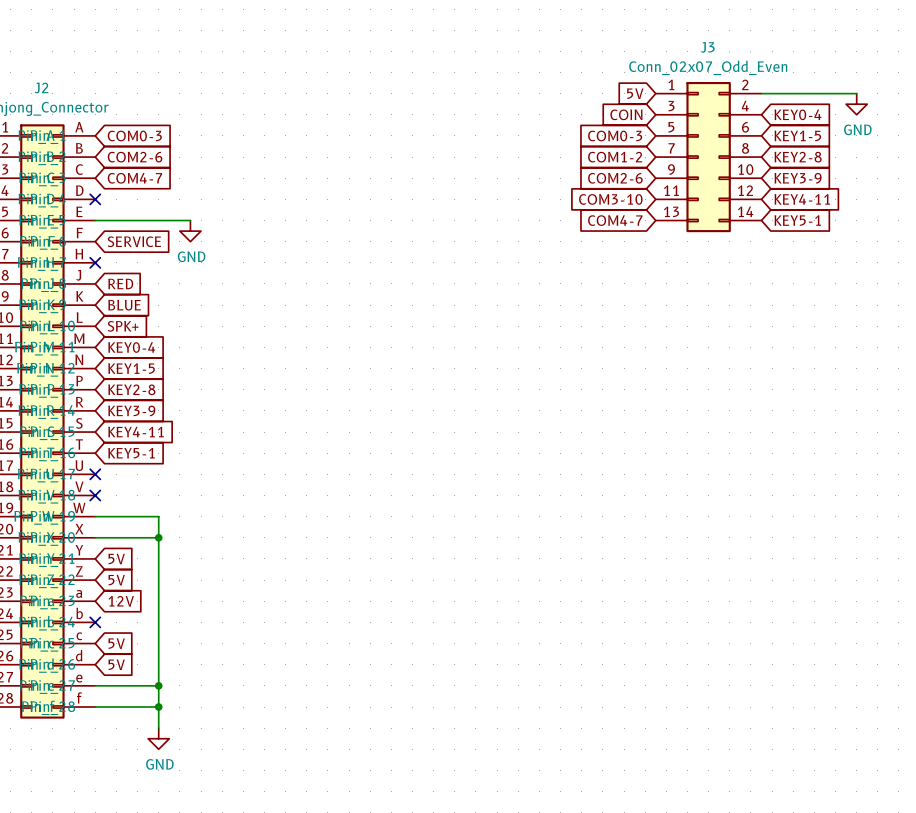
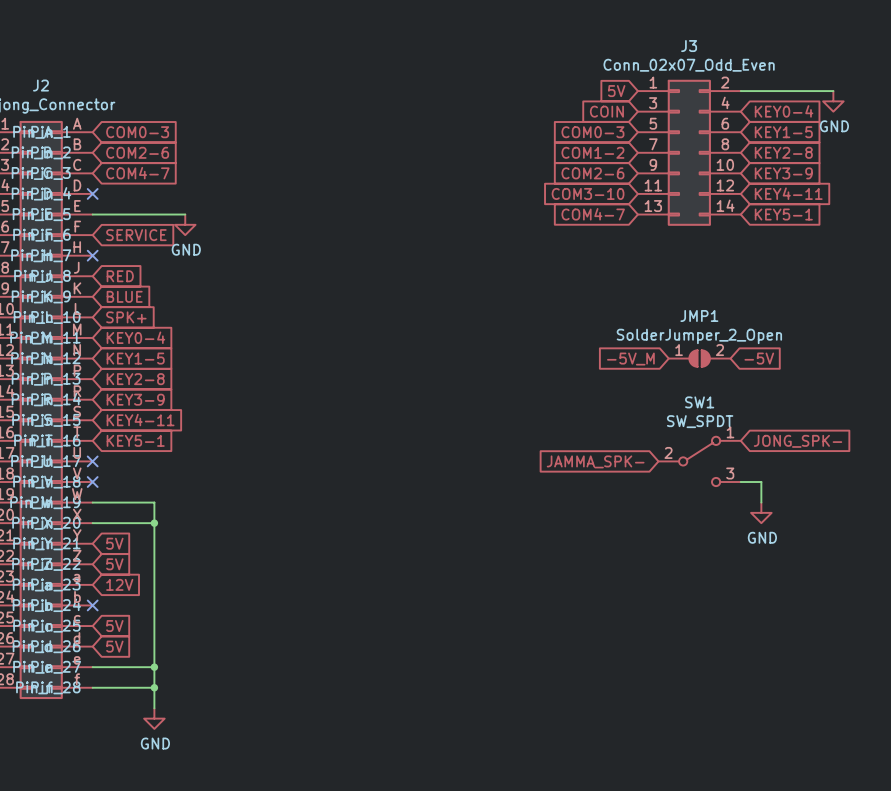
JMP1: none -> SolderJumper_2_Open (699, 358)
global label: none -> -5V (759, 358)
global label: none -> -5V_M (630, 359)
global label: none -> JONG_SPK- (798, 441)
SW1: none -> SW_SPDT (699, 461)
global label: none -> JAMMA_SPK- (595, 461)
wire: none -> (740, 482) (761, 482) (761, 502)
power symbol: none -> GND (761, 512)

